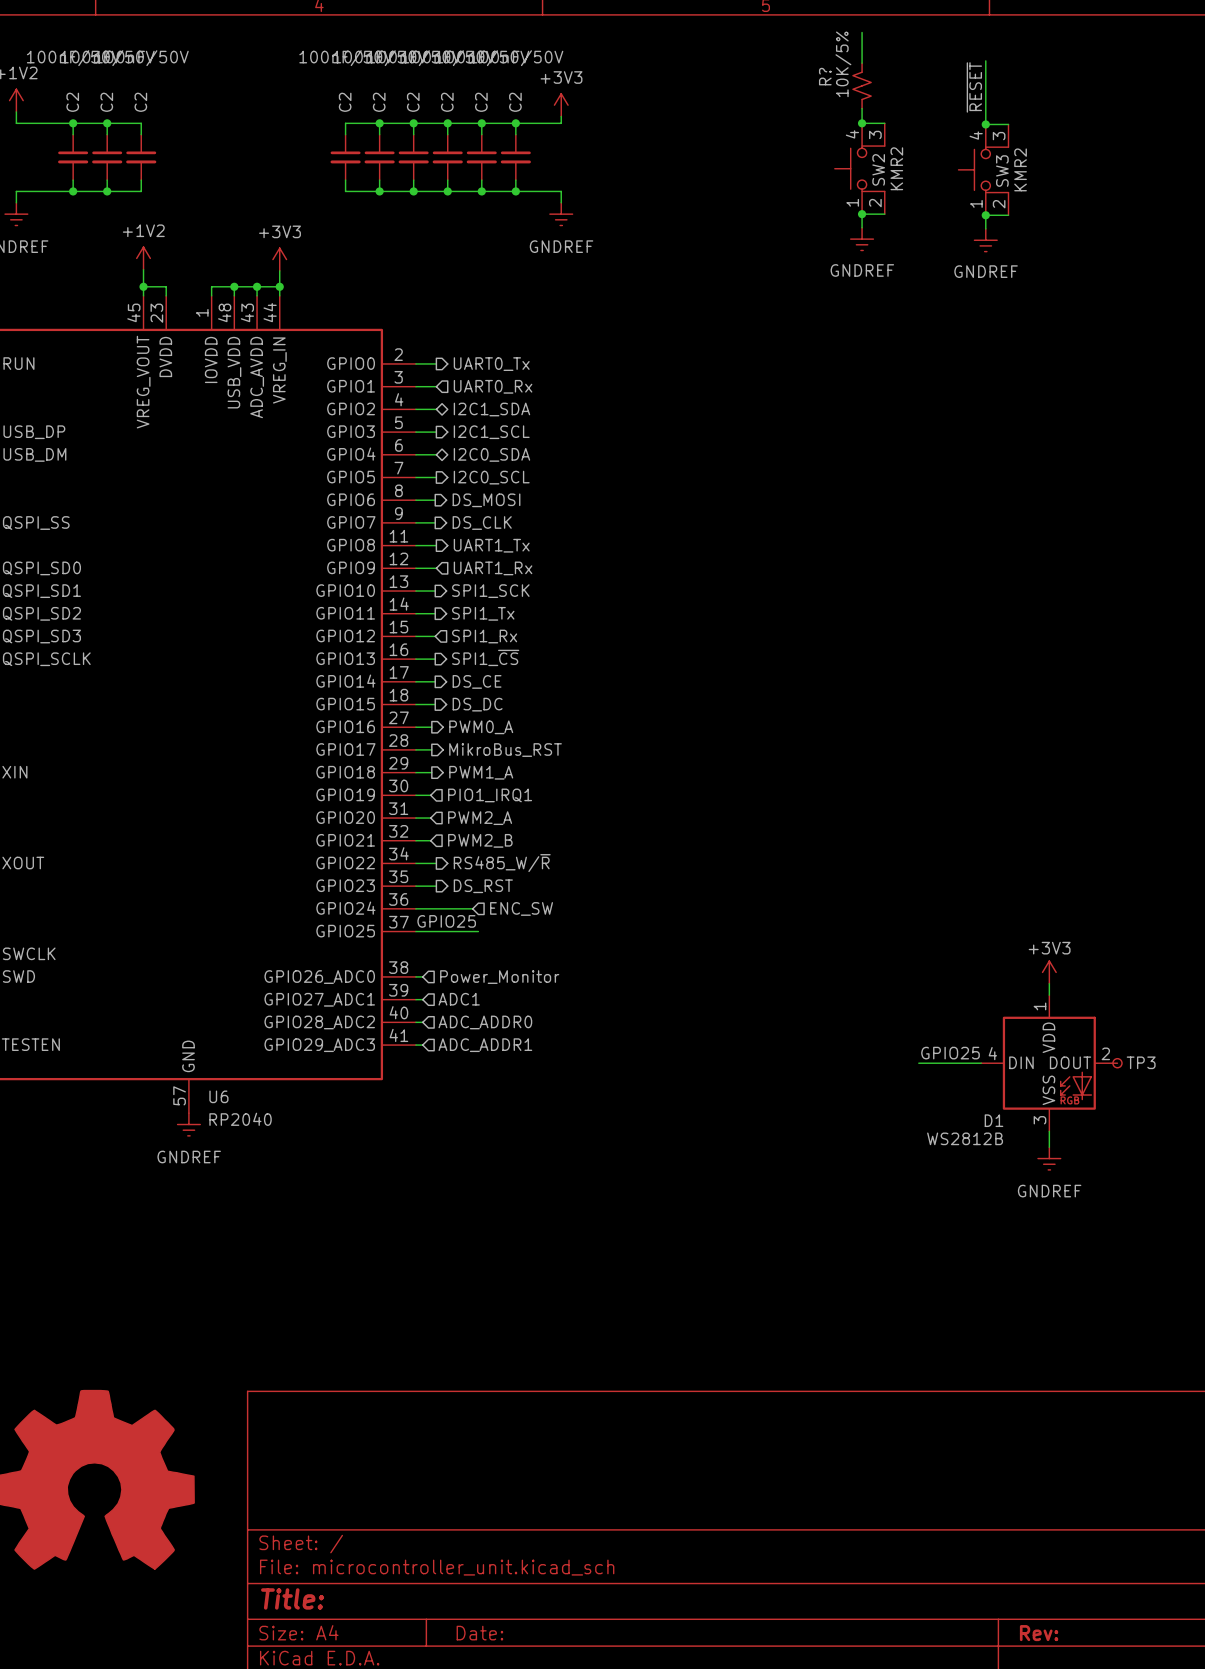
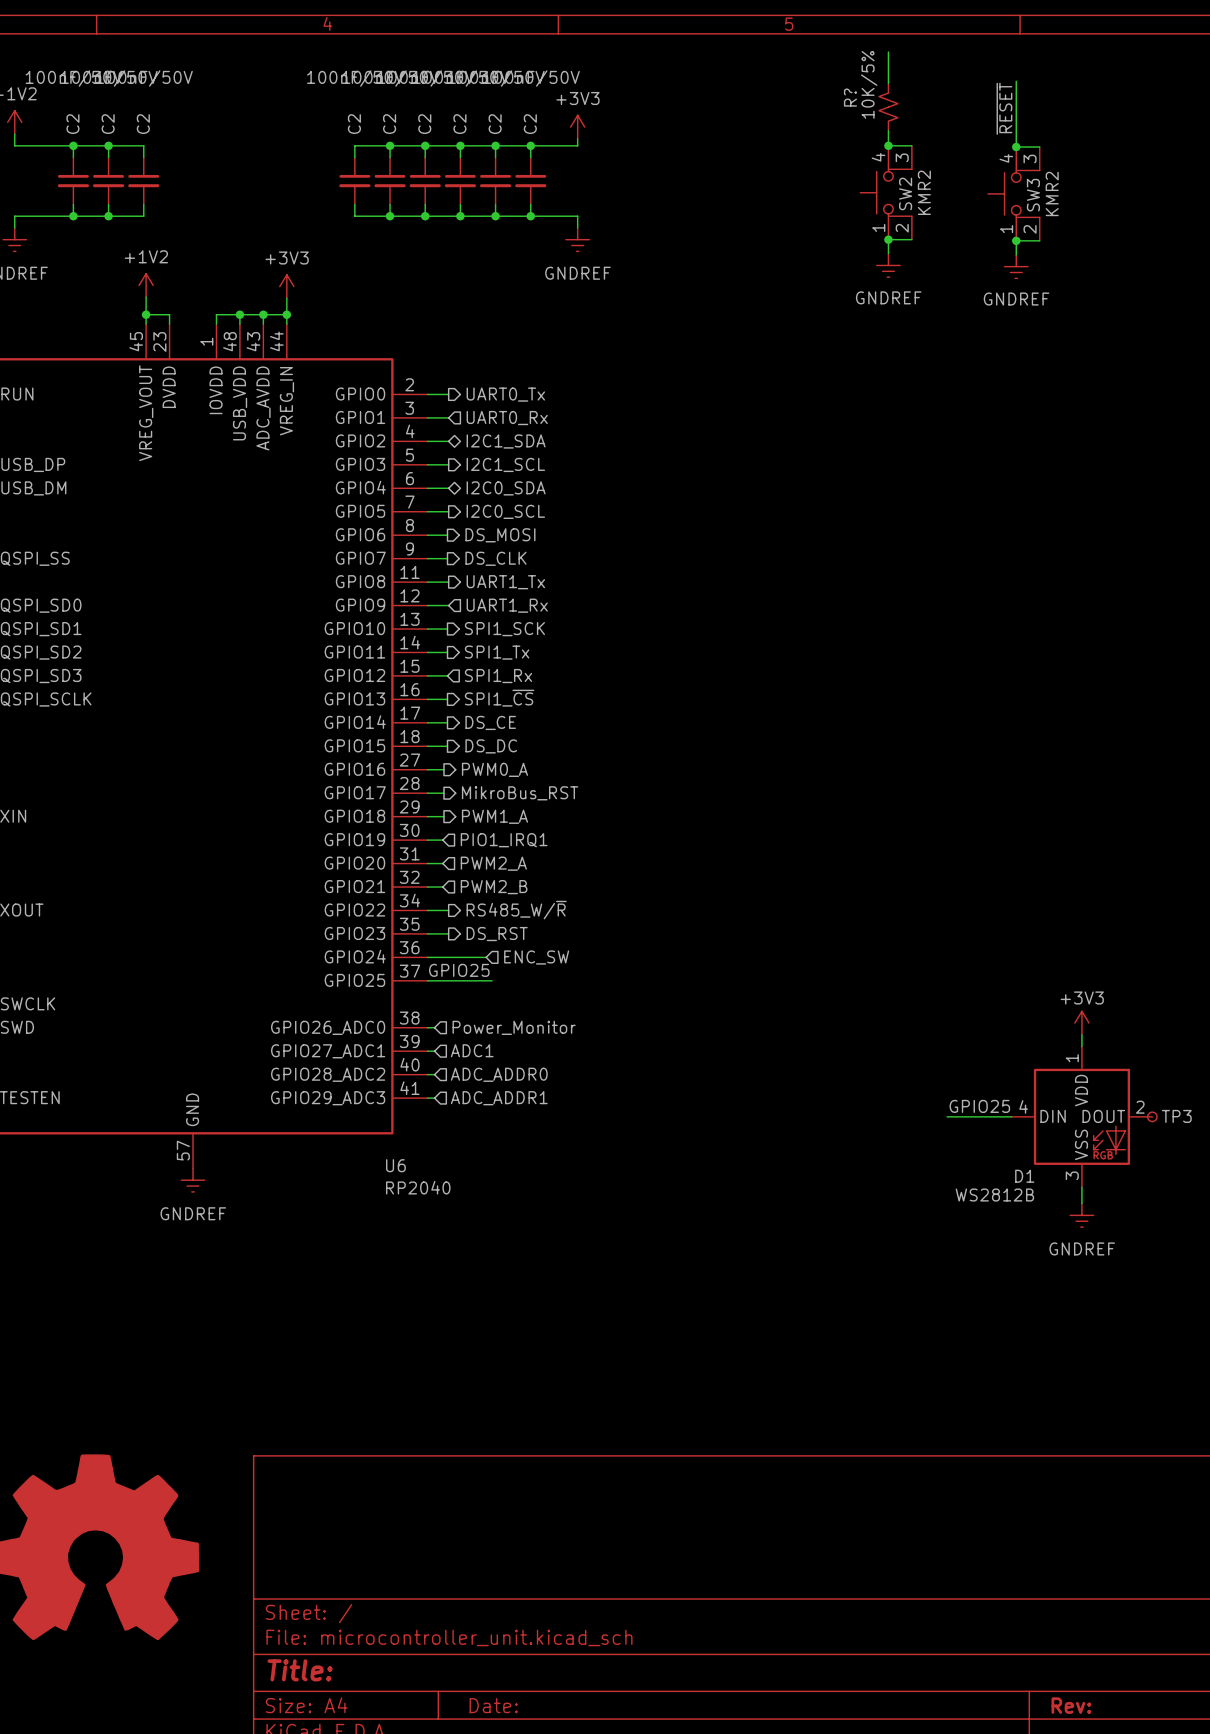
U6 name position: U6 (218, 1096) -> U6 (395, 1165)
U6 value position: RP2040 (240, 1119) -> RP2040 (418, 1187)

